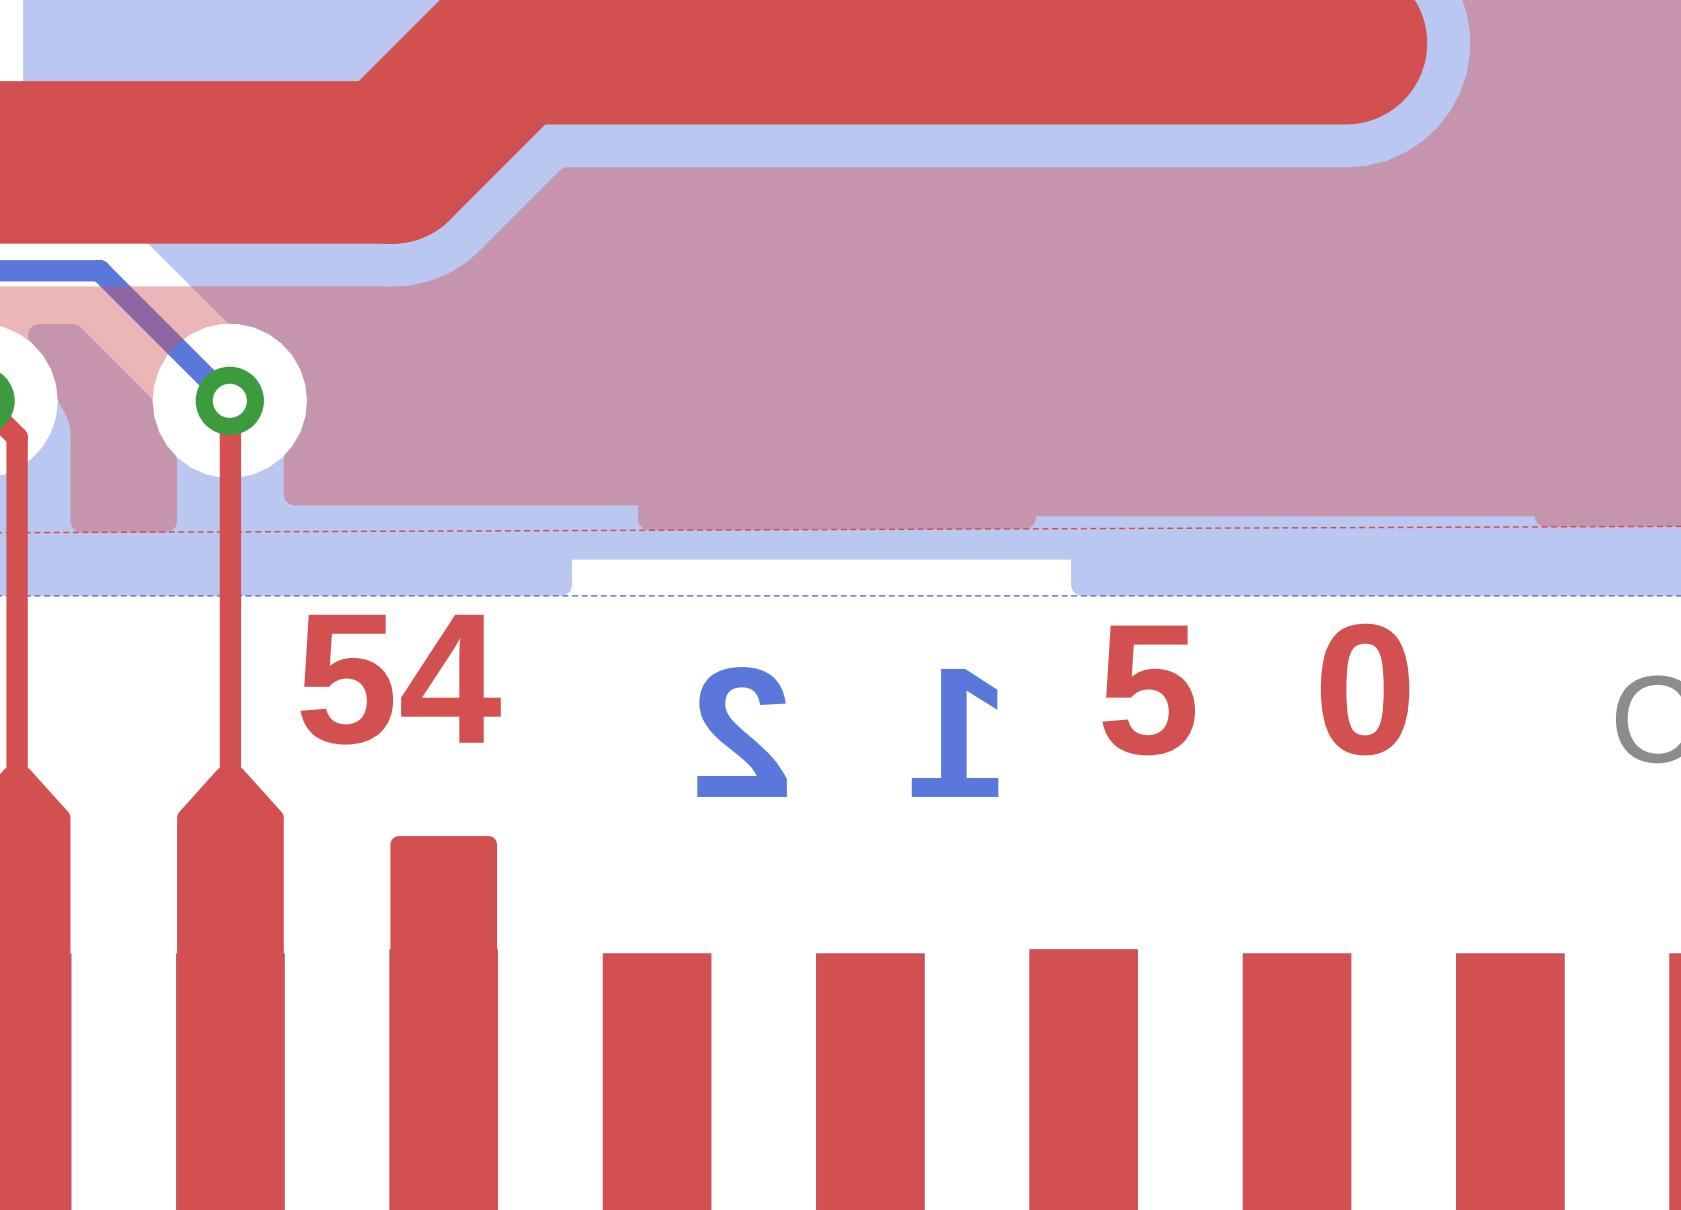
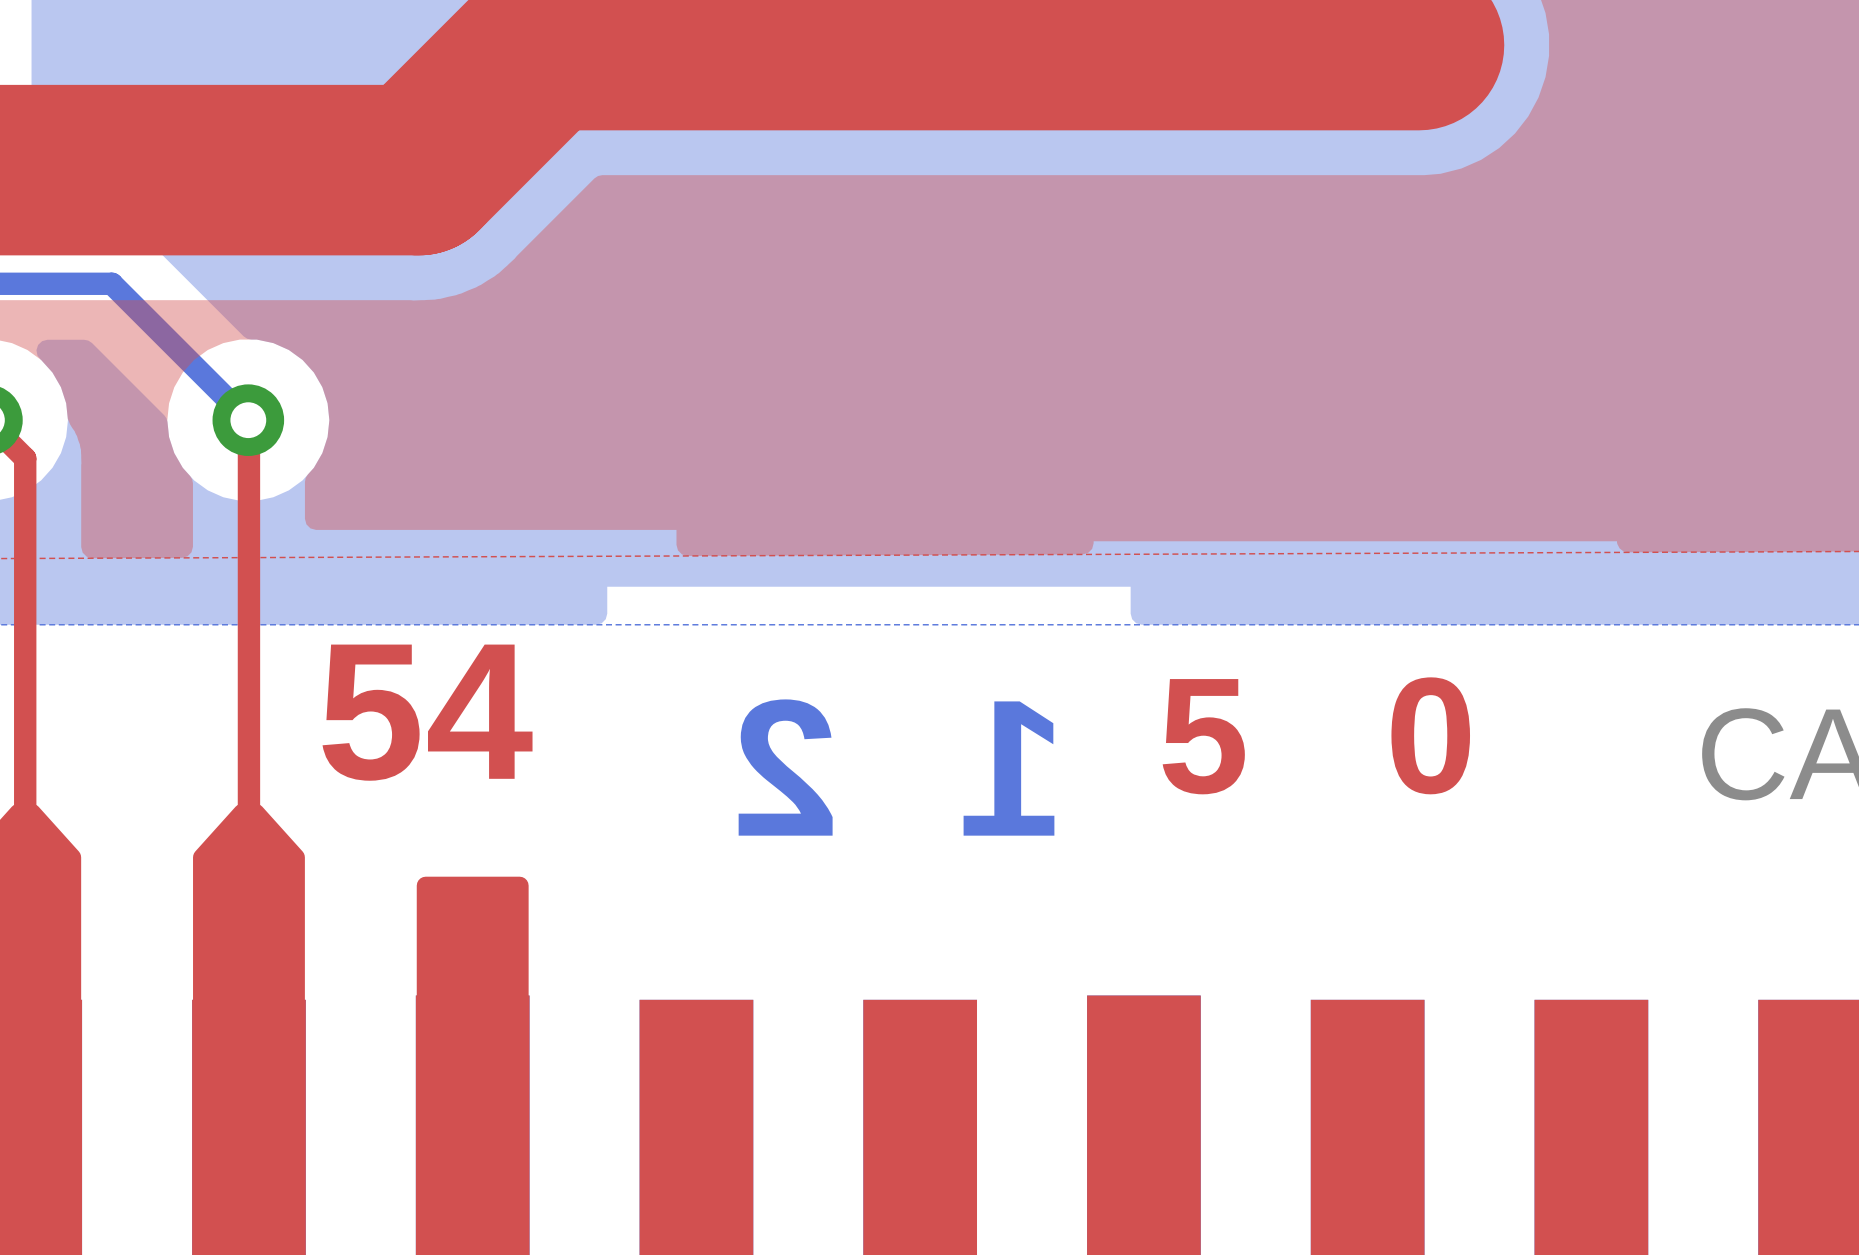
text position: 0 (1365, 689) -> 0 (1430, 735)
text position: 5 (1148, 690) -> 5 (1203, 736)

